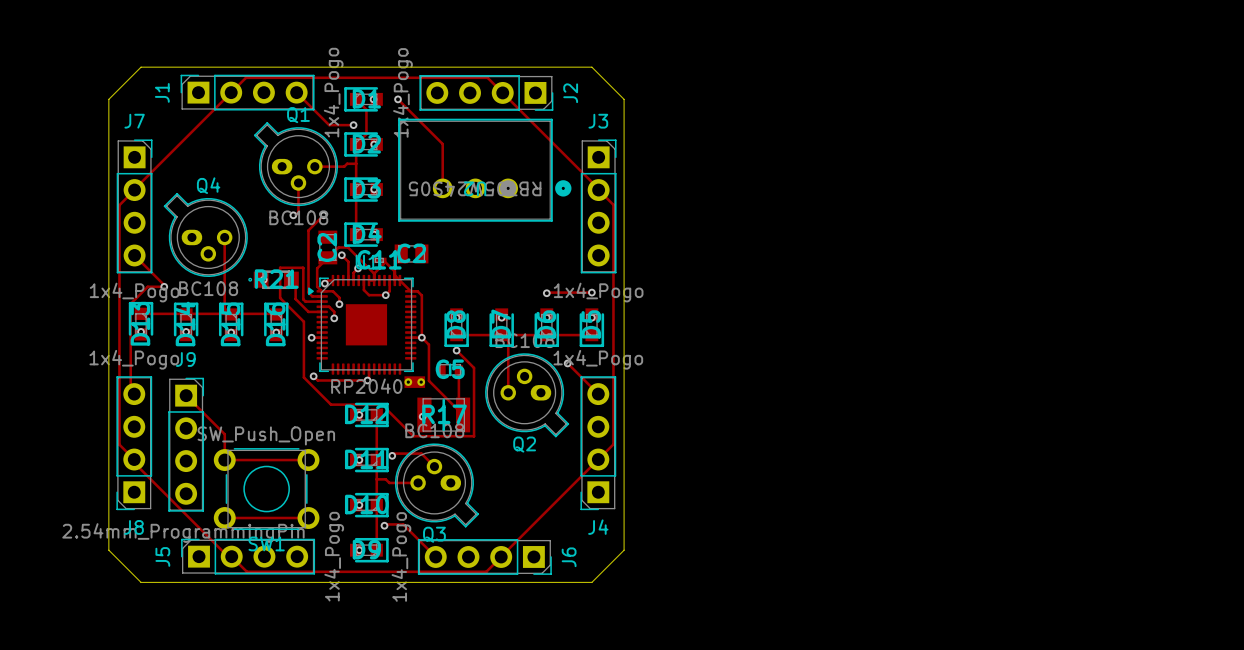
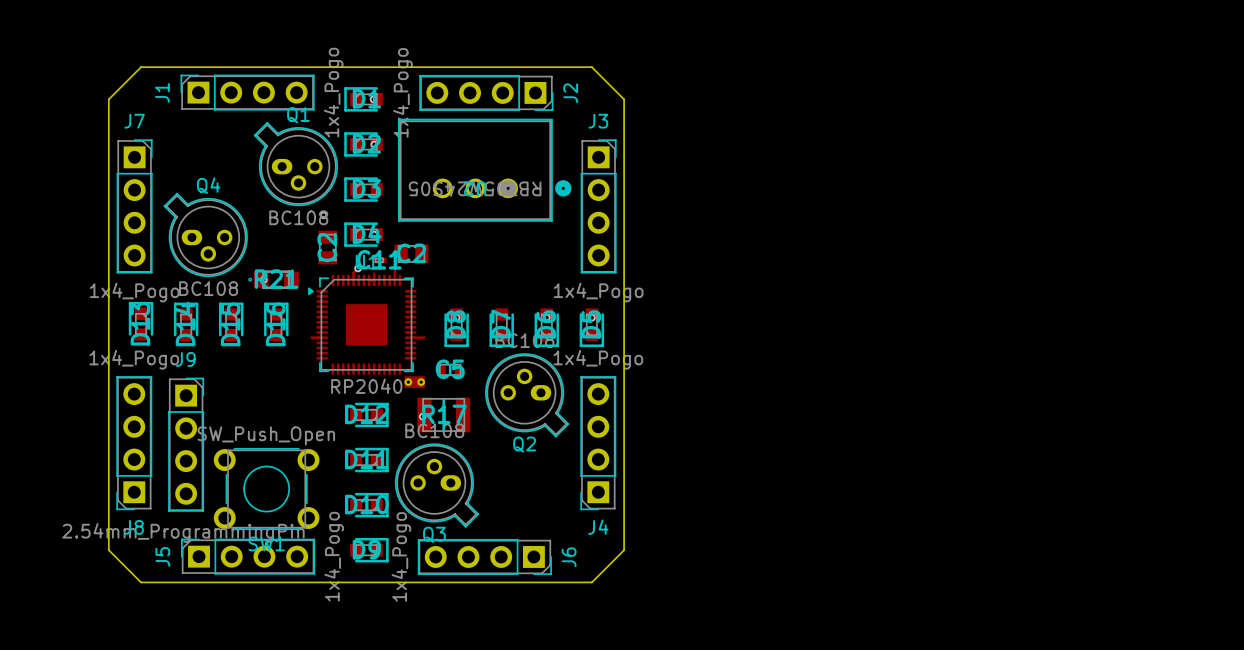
track: (246, 77) (119, 205) (119, 444) (134, 459) (134, 462) (228, 556) (231, 556) (246, 571) (486, 571) (613, 444) (613, 204) (487, 77) (246, 77) -> none
track: (296, 92) (329, 125) (353, 125) -> none
track: (356, 99) (366, 109) (366, 134) (356, 144) (356, 234) -> none
track: (398, 99) (442, 144) (442, 188) -> none
via: (398, 99) -> none
via: (353, 125) -> none
track: (356, 163) (347, 163) (344, 166) (314, 166) -> none
track: (298, 182) (298, 212) (293, 215) -> none
via: (374, 189) -> none
via: (293, 215) -> none
track: (323, 215) (308, 230) (308, 292) (312, 296) (322, 296) -> none
track: (224, 237) (224, 313) -> none
track: (134, 255) (164, 286) (147, 286) (130, 303) (130, 390) (134, 394) -> none
track: (341, 255) (348, 261) (348, 280) -> none
via: (341, 255) -> none
track: (394, 271) (383, 260) (383, 264) (374, 273) (348, 247) (338, 247) (317, 268) (317, 286) (321, 291) (332, 291) (339, 297) (339, 304) -> none
track: (394, 275) (410, 291) (417, 291) (421, 295) (421, 337) (428, 344) (428, 380) (463, 414) -> none
track: (291, 279) (295, 283) (295, 299) (308, 311) (322, 311) -> none
track: (332, 280) (327, 280) (324, 283) -> none
track: (363, 280) (363, 290) (369, 295) (385, 295) (389, 291) (389, 280) -> none
via: (324, 283) -> none
via: (164, 286) -> none
track: (591, 292) (546, 293) -> none
via: (591, 292) -> none
via: (546, 293) -> none
via: (385, 295) -> none
track: (322, 301) (305, 301) (303, 299) (303, 267) (280, 267) (280, 298) (303, 321) (303, 377) (331, 404) (386, 404) (386, 409) (413, 436) (474, 436) (474, 367) (456, 350) -> none
via: (339, 304) -> none
track: (322, 306) (329, 306) (334, 311) (334, 318) -> none
track: (141, 313) (276, 314) -> none
via: (501, 317) -> none
via: (334, 318) -> none
via: (141, 331) -> none
via: (186, 331) -> none
via: (231, 332) -> none
via: (276, 332) -> none
track: (456, 335) (591, 335) -> none
track: (508, 335) (508, 392) -> none
via: (311, 337) -> none
via: (421, 337) -> none
via: (456, 350) -> none
track: (566, 363) (598, 394) -> none
via: (567, 363) -> none
track: (369, 369) (367, 380) (317, 380) (313, 376) -> none
track: (458, 369) (458, 410) -> none
via: (313, 376) -> none
via: (367, 380) -> none
track: (186, 395) (224, 434) (224, 460) (308, 460) -> none
via: (359, 414) -> none
track: (376, 414) (376, 550) -> none
track: (392, 455) (392, 453) (421, 453) (434, 466) -> none
via: (392, 455) -> none
via: (359, 460) -> none
track: (376, 479) (385, 479) (389, 482) (418, 482) -> none
via: (359, 505) -> none
track: (224, 518) (308, 518) -> none
track: (384, 525) (403, 524) (435, 556) -> none
via: (384, 525) -> none
via: (359, 550) -> none

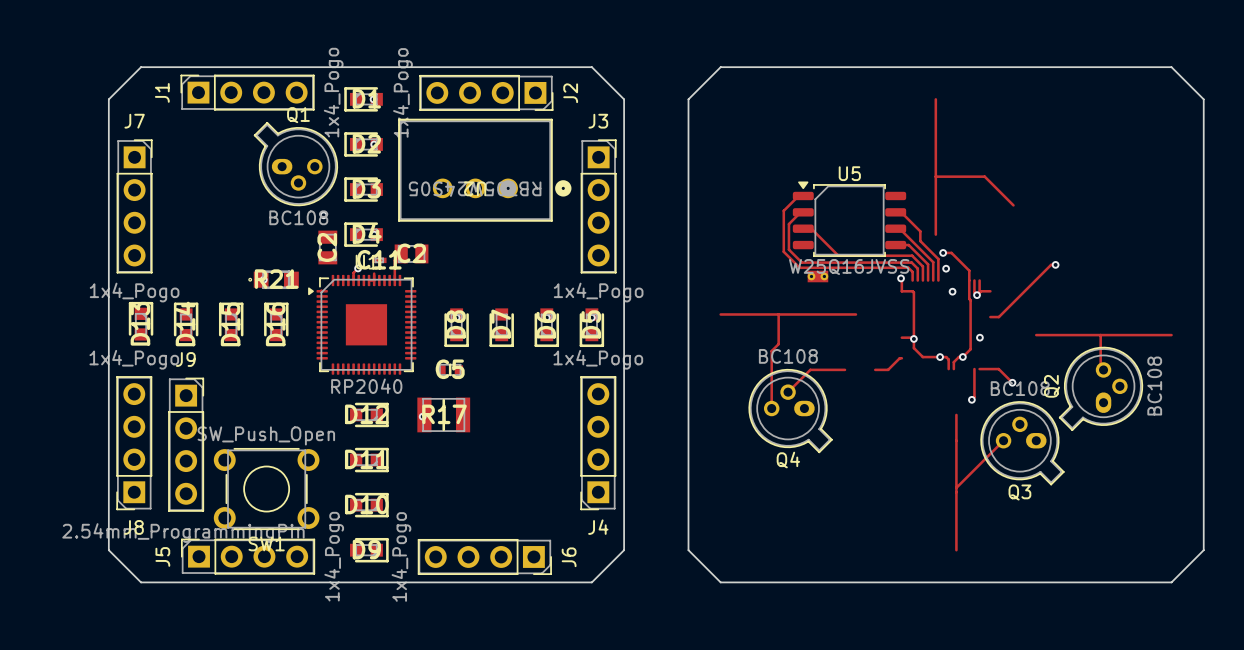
board edge: none -> (720, 67) (1171, 67) (1203, 99) (1203, 550) (1171, 582) (720, 582) (688, 550) (688, 99) (720, 67)
track: none -> (935, 99) (935, 234)
track: none -> (935, 176) (984, 176) (1013, 205)
track: none -> (803, 195) (798, 195) (783, 210) (783, 251) (799, 267) (908, 267) (912, 271) (912, 280)
track: none -> (803, 212) (800, 212) (788, 224) (788, 249) (801, 262) (911, 262) (917, 268) (917, 280)
track: none -> (895, 213) (902, 213) (920, 231) (920, 241) (938, 259) (938, 280)
U5: none -> W25Q16JVSS (849, 219)
track: none -> (803, 228) (811, 228) (838, 255) (912, 255) (922, 266) (922, 280)
track: none -> (895, 229) (900, 229) (933, 262) (933, 280)
Q4 rotation: 0° (205, 234) -> 180° (790, 411)
Q4 position: (205, 234) -> (790, 411)
track: none -> (895, 245) (908, 245) (928, 264) (928, 280)
track: none -> (943, 252) (951, 252) (969, 270) (970, 349) (953, 362) (953, 369)
via: none -> (943, 252)
track: none -> (1055, 264) (1051, 264) (998, 317) (990, 317)
via: none -> (1055, 264)
via: none -> (946, 268)
part: none -> (817, 276)
track: none -> (901, 278) (901, 291) (913, 292) (913, 348) (922, 357) (946, 357) (948, 359) (948, 369)
via: none -> (901, 278)
track: none -> (974, 280) (974, 292) (977, 295) (980, 291) (990, 291)
track: none -> (979, 280) (979, 292)
via: none -> (952, 291)
via: none -> (977, 295)
track: none -> (720, 314) (855, 314)
track: none -> (778, 314) (778, 344) (771, 351) (771, 408)
track: none -> (1036, 335) (1171, 335)
track: none -> (1100, 335) (1100, 367) (1103, 369)
track: (311, 337) (322, 337) -> none
track: (410, 337) (424, 337) -> none
track: none -> (901, 337) (913, 338)
via: none -> (979, 337)
via: none -> (913, 338)
via: none -> (962, 356)
via: none -> (940, 357)
track: none -> (901, 358) (888, 369) (875, 369)
track: none -> (844, 369) (810, 369) (788, 392)
track: none -> (974, 369) (974, 397) (971, 399)
track: none -> (979, 369) (998, 369) (1012, 382)
part: (414, 382) -> none
via: none -> (1012, 382)
Q2 rotation: 0° (527, 395) -> 90° clockwise (1101, 388)
Q2 position: (527, 395) -> (1101, 388)
via: none -> (971, 399)
track: none -> (956, 414) (956, 550)
track: none -> (1003, 440) (956, 487)
Q3 position: (436, 485) -> (1022, 443)

